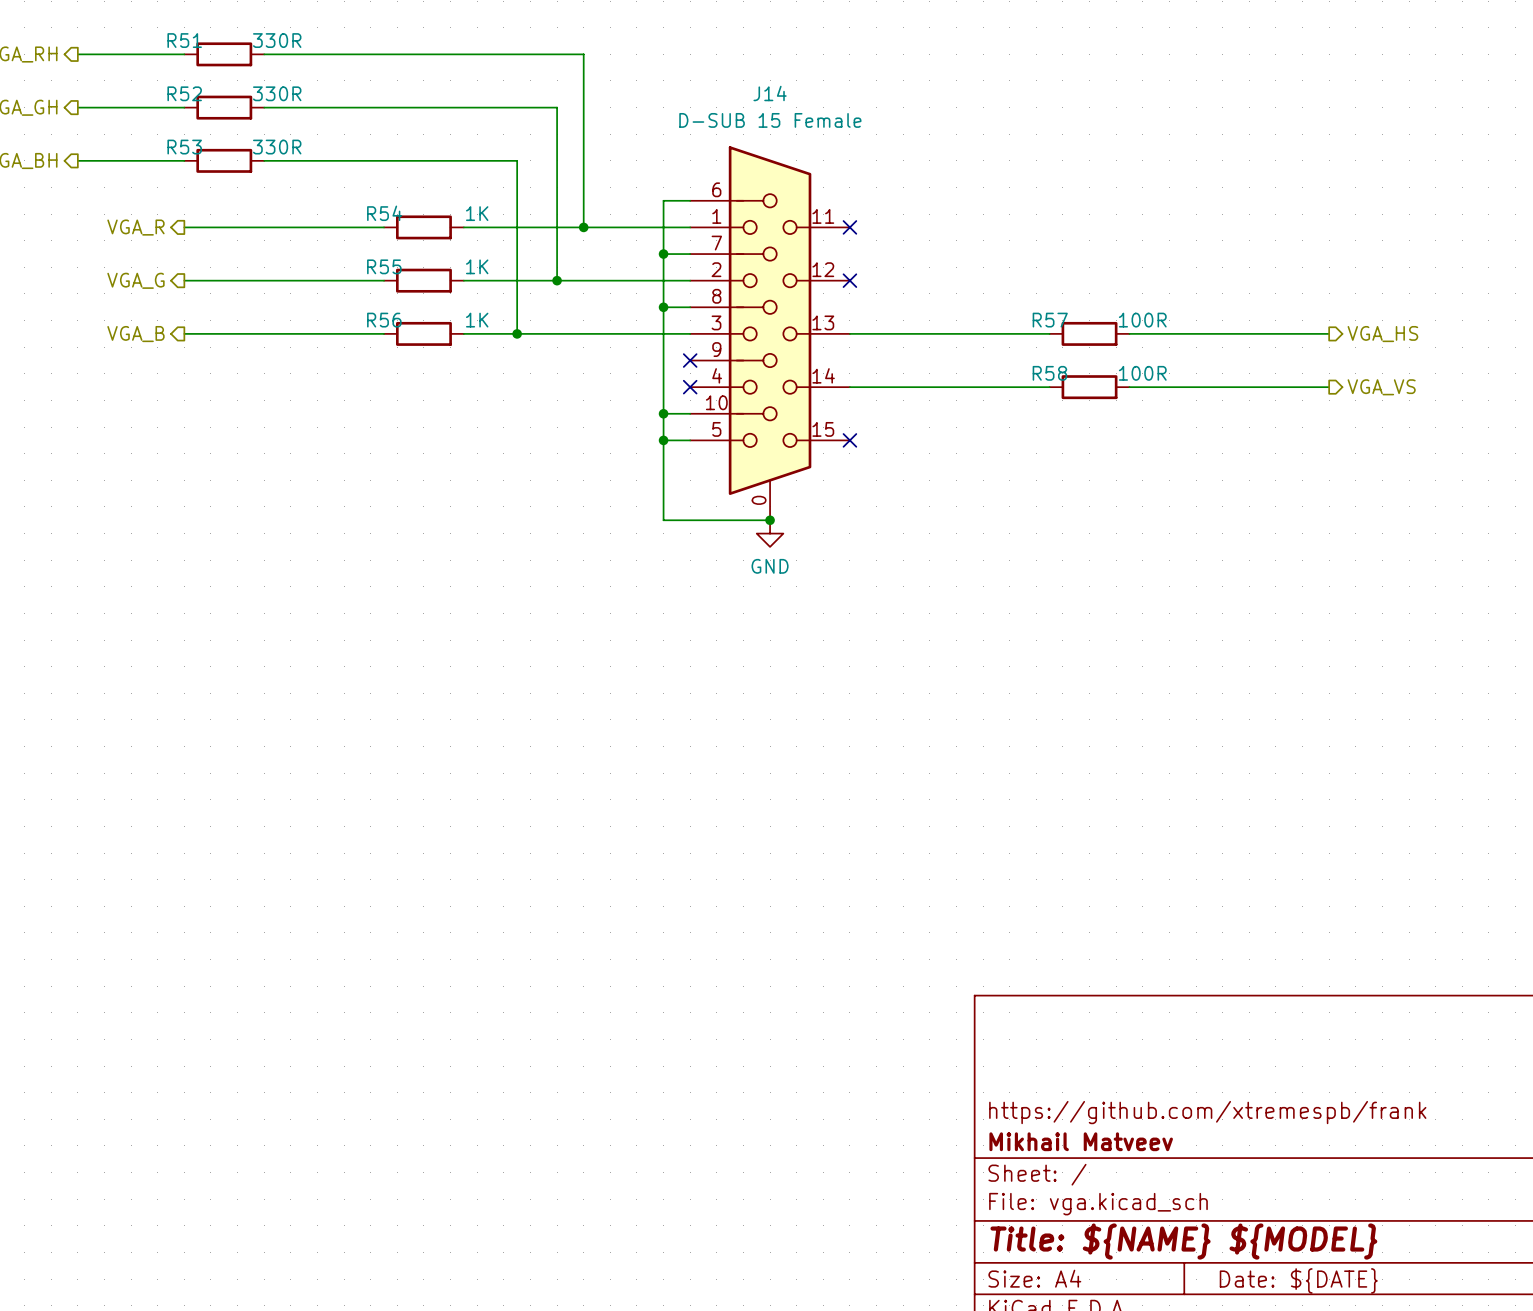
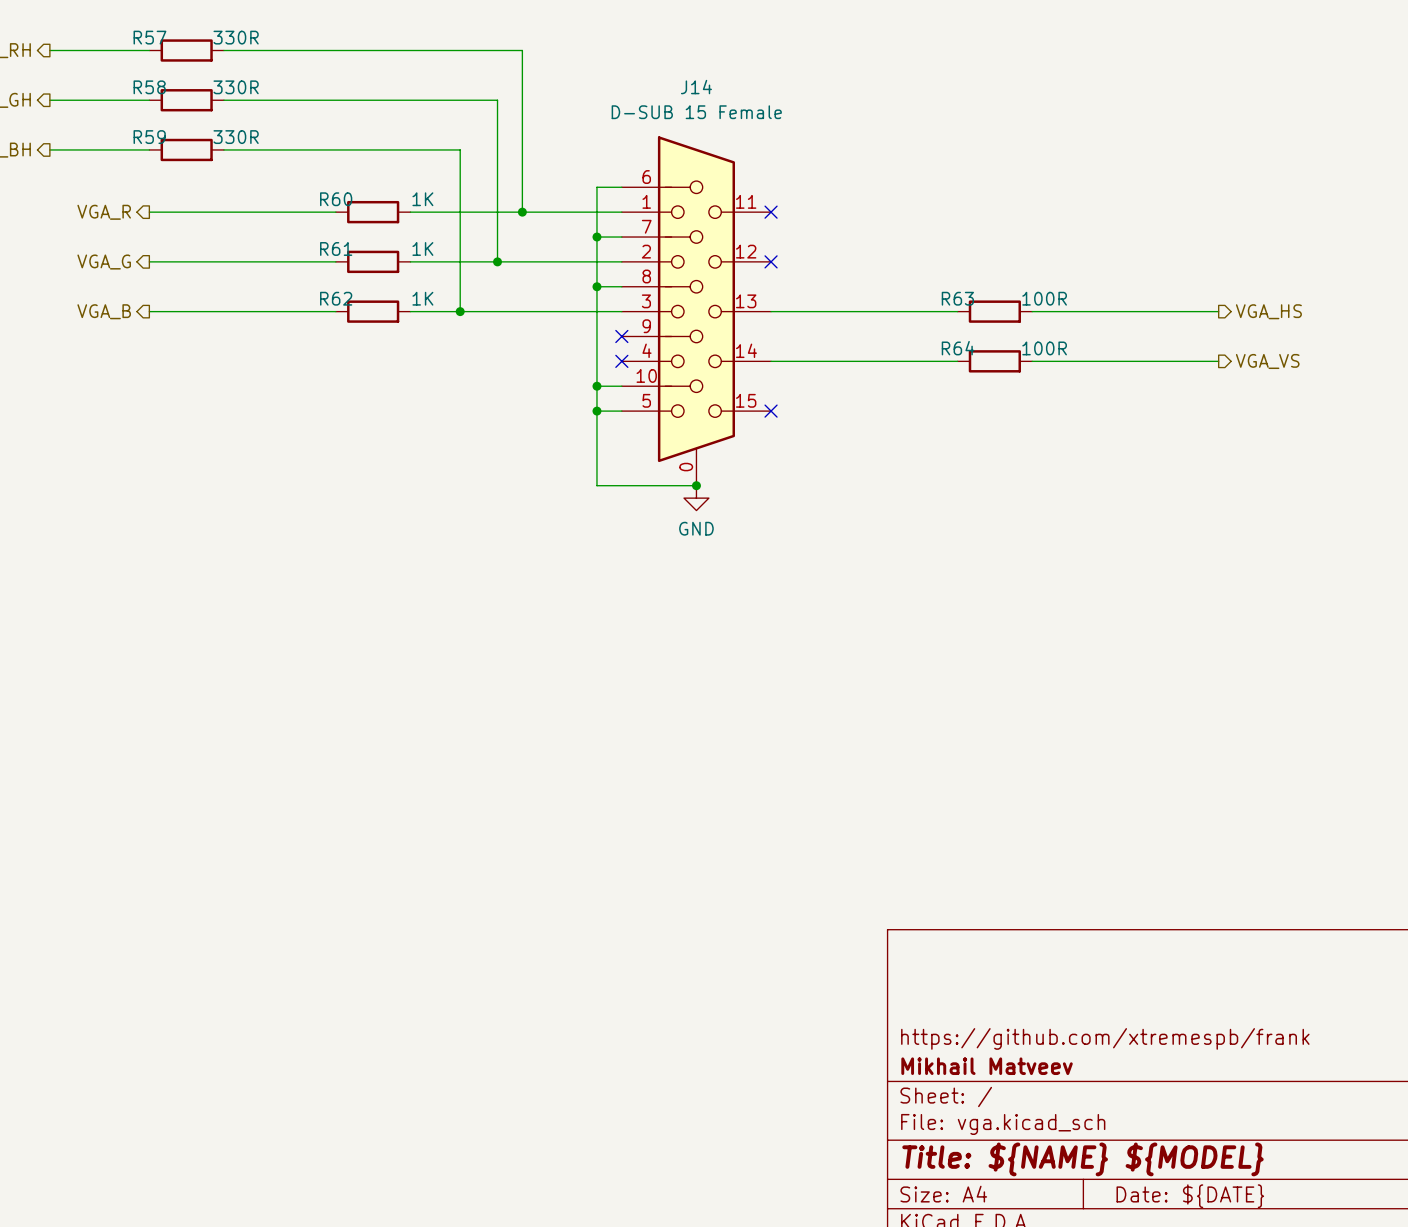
R51 name: R51 (184, 40) -> R57 (149, 37)
R52 name: R52 (184, 93) -> R58 (149, 87)
R53 name: R53 (184, 147) -> R59 (149, 137)
R54 name: R54 (384, 213) -> R60 (336, 199)
R55 name: R55 (384, 266) -> R61 (336, 248)
R56 name: R56 (384, 320) -> R62 (336, 298)
R57 name: R57 (1050, 320) -> R63 (957, 298)
R58 name: R58 (1049, 373) -> R64 (958, 348)

